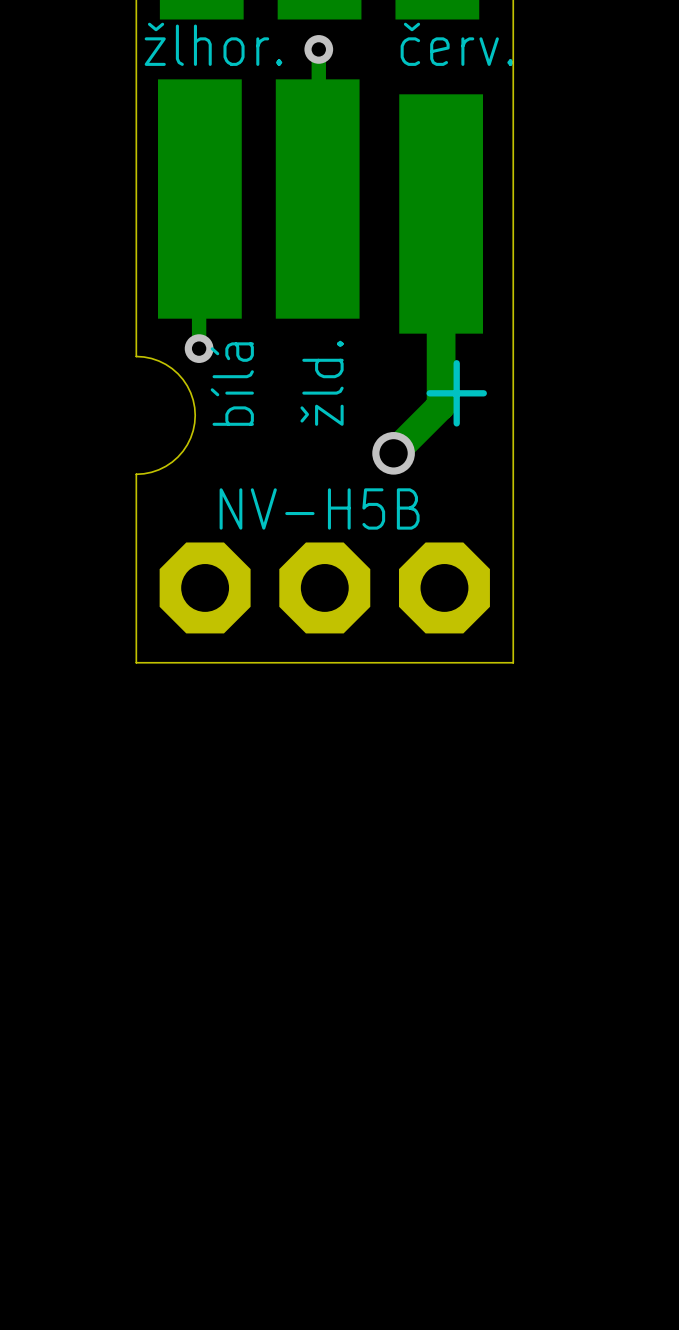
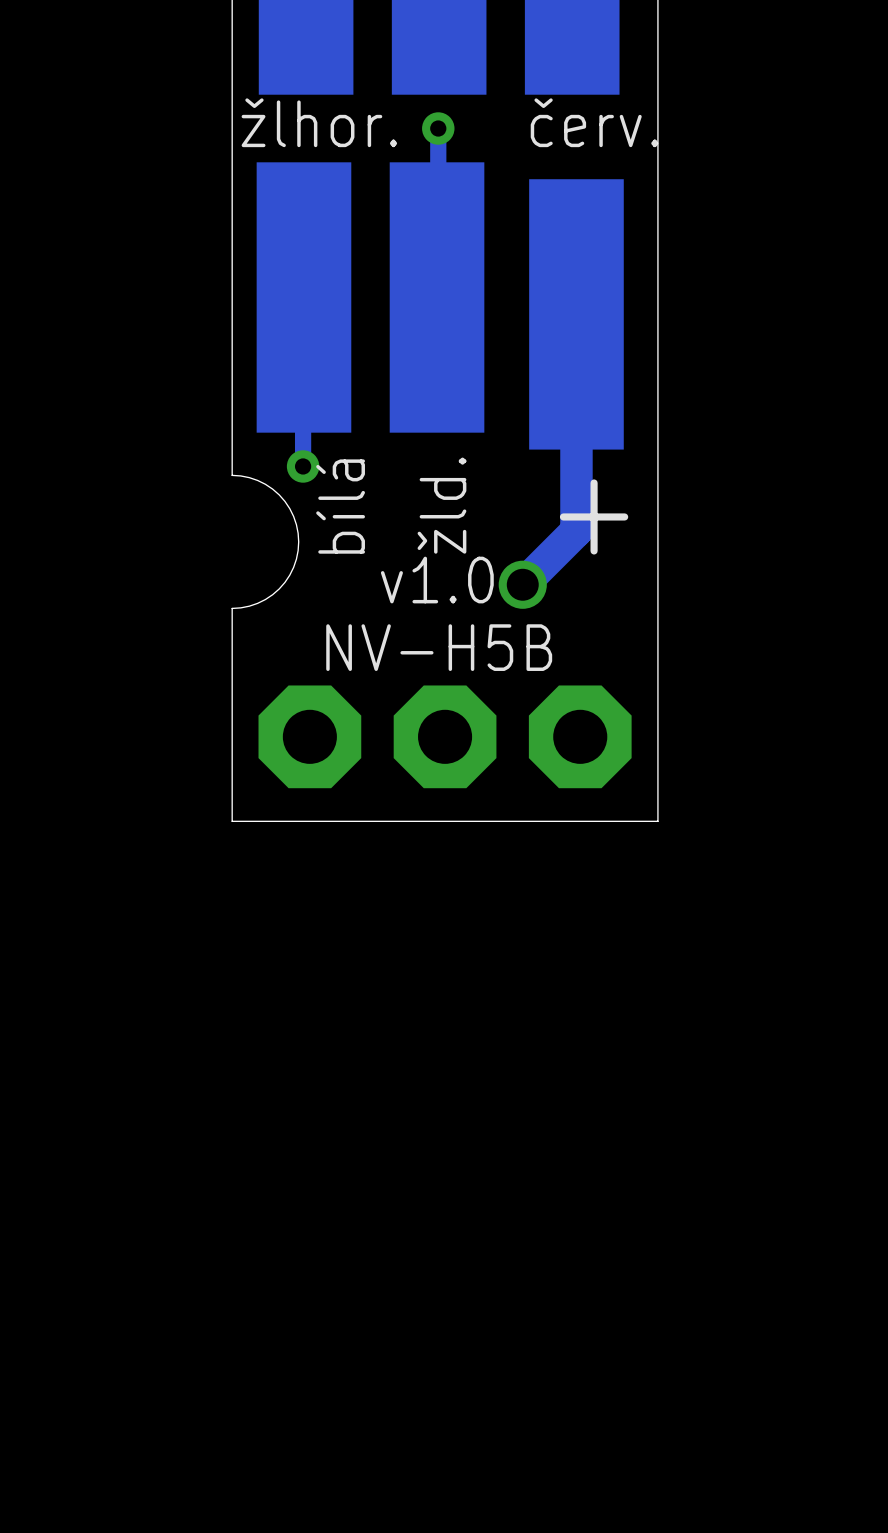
text: none -> v1.0 (437, 580)

